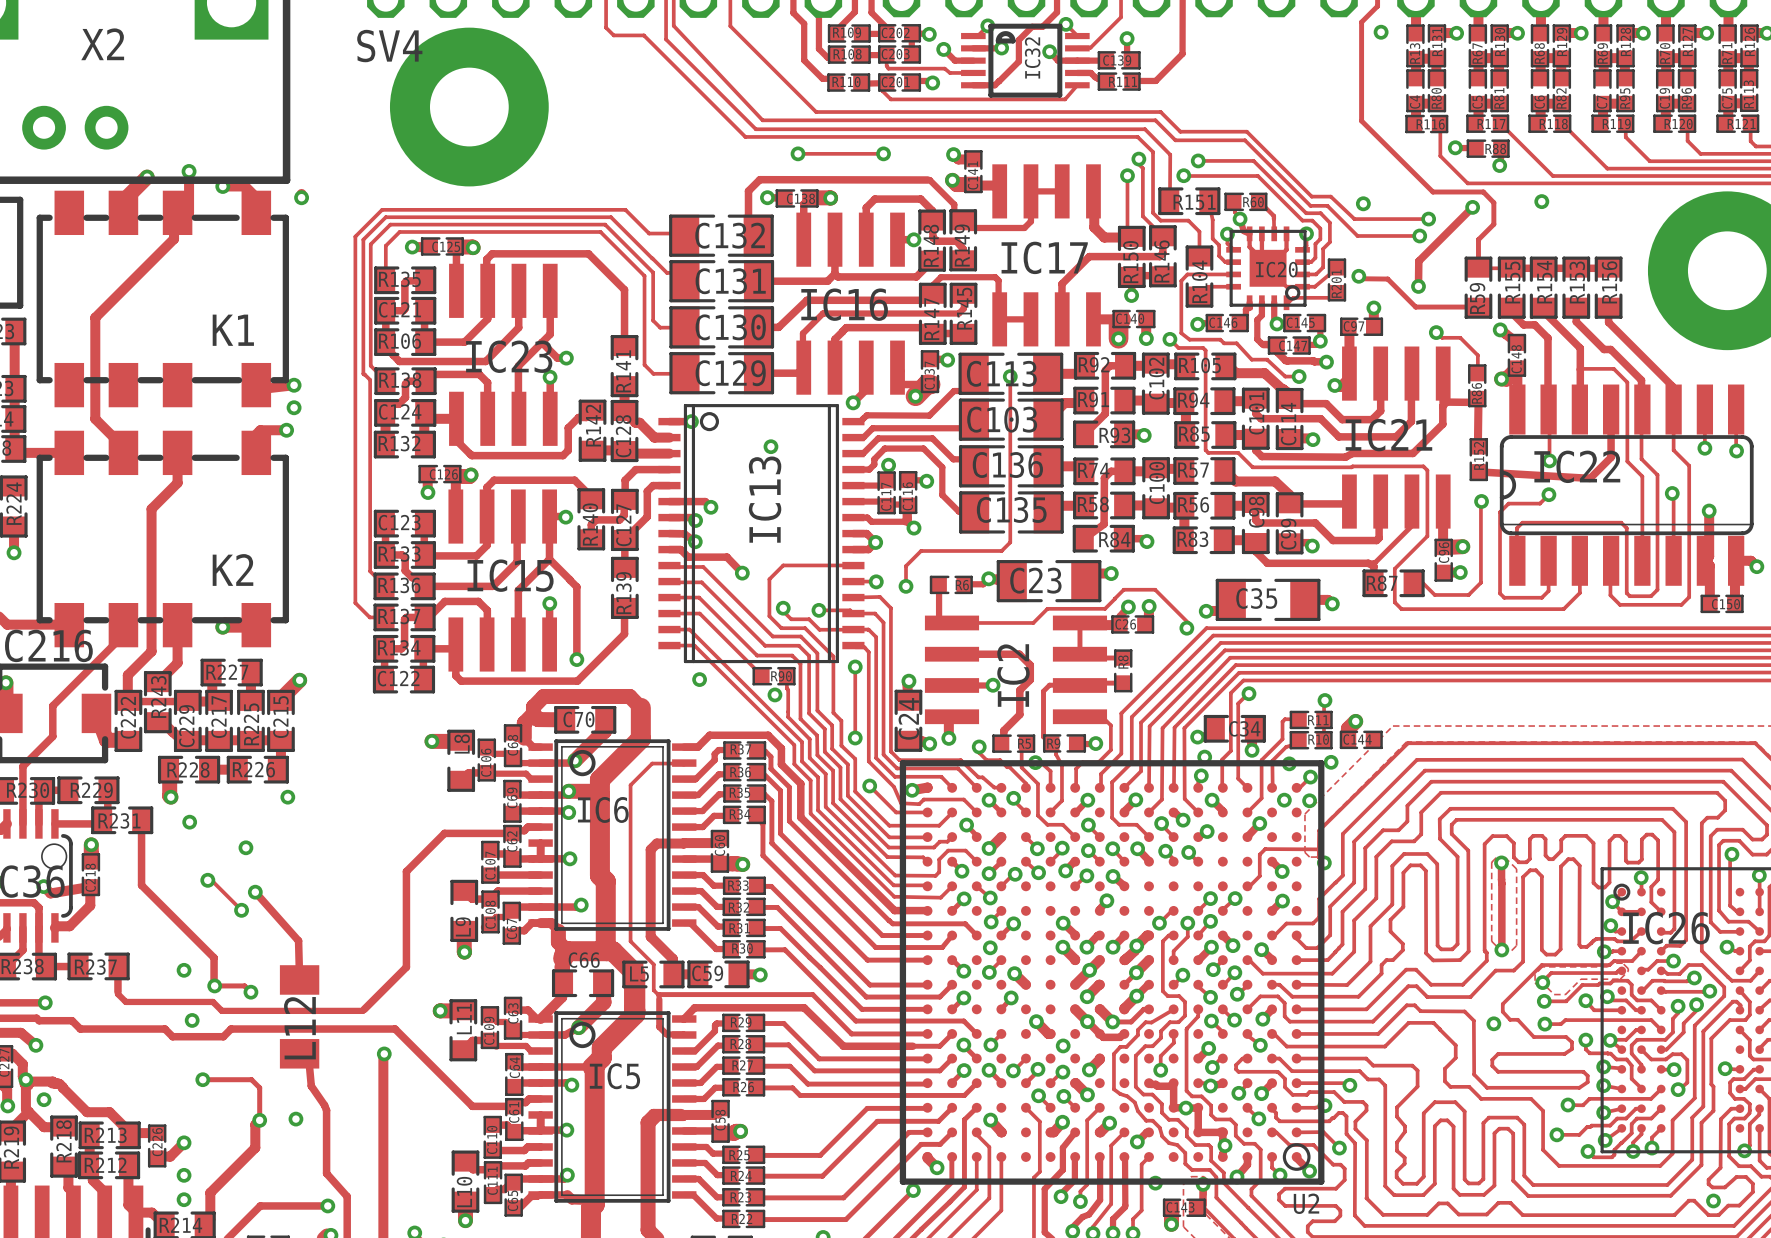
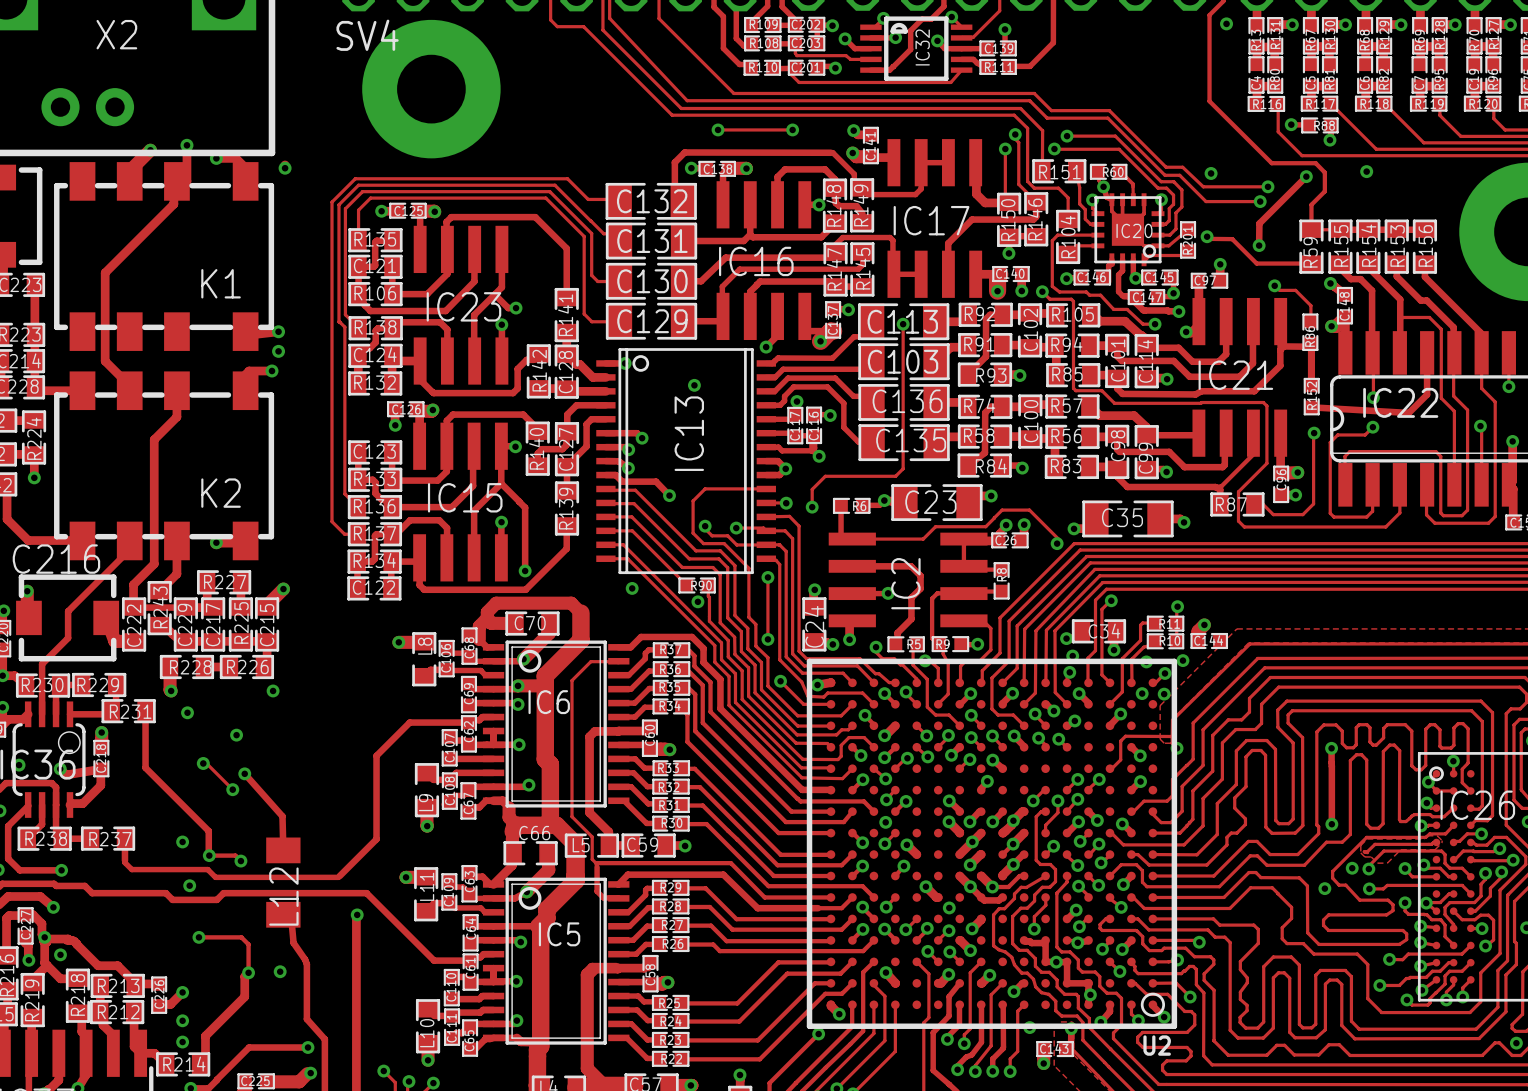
zone outline: (1496, 857) (1505, 857) (1516, 869) (1516, 945) (1511, 950) (1500, 950) (1491, 941) (1491, 862) (1496, 857) -> none
track: (1613, 980) (1610, 983) (1582, 985) (1566, 1001) (1544, 1001) -> (1428, 851) (1383, 851) (1369, 865) (1369, 868)
via position: (1542, 982) -> (1352, 868)

